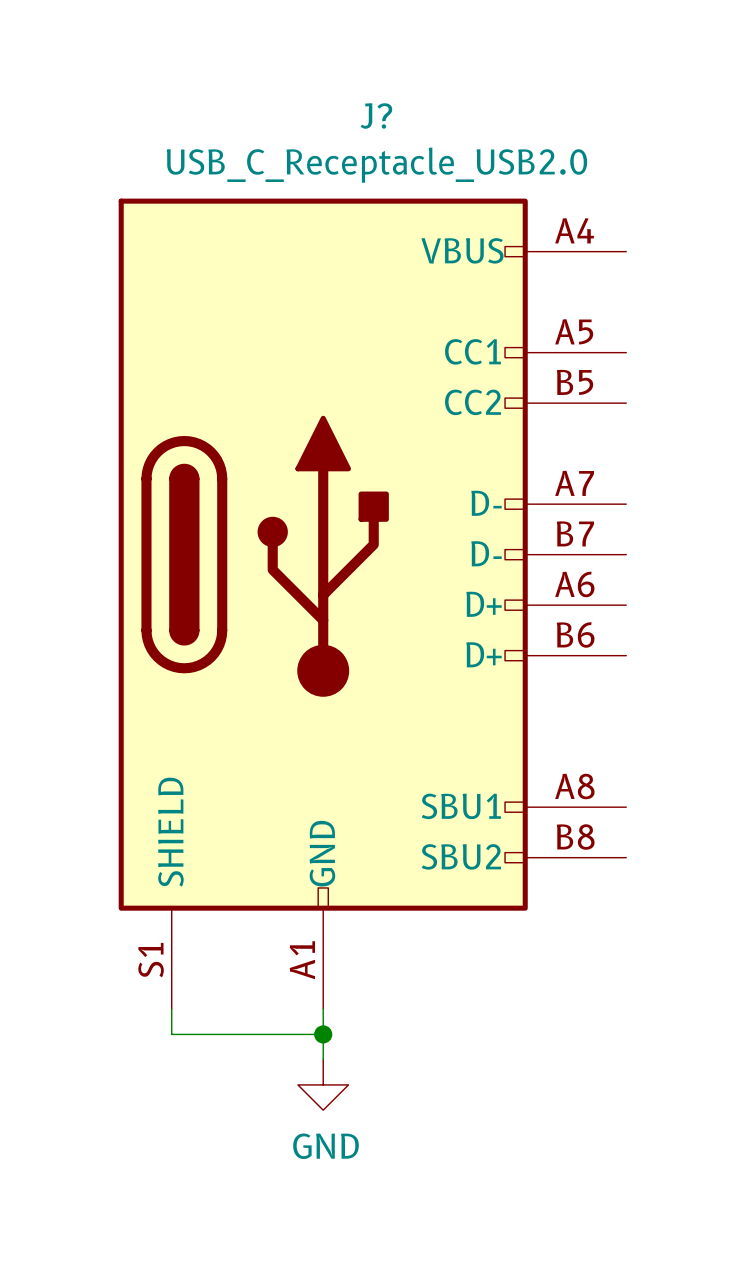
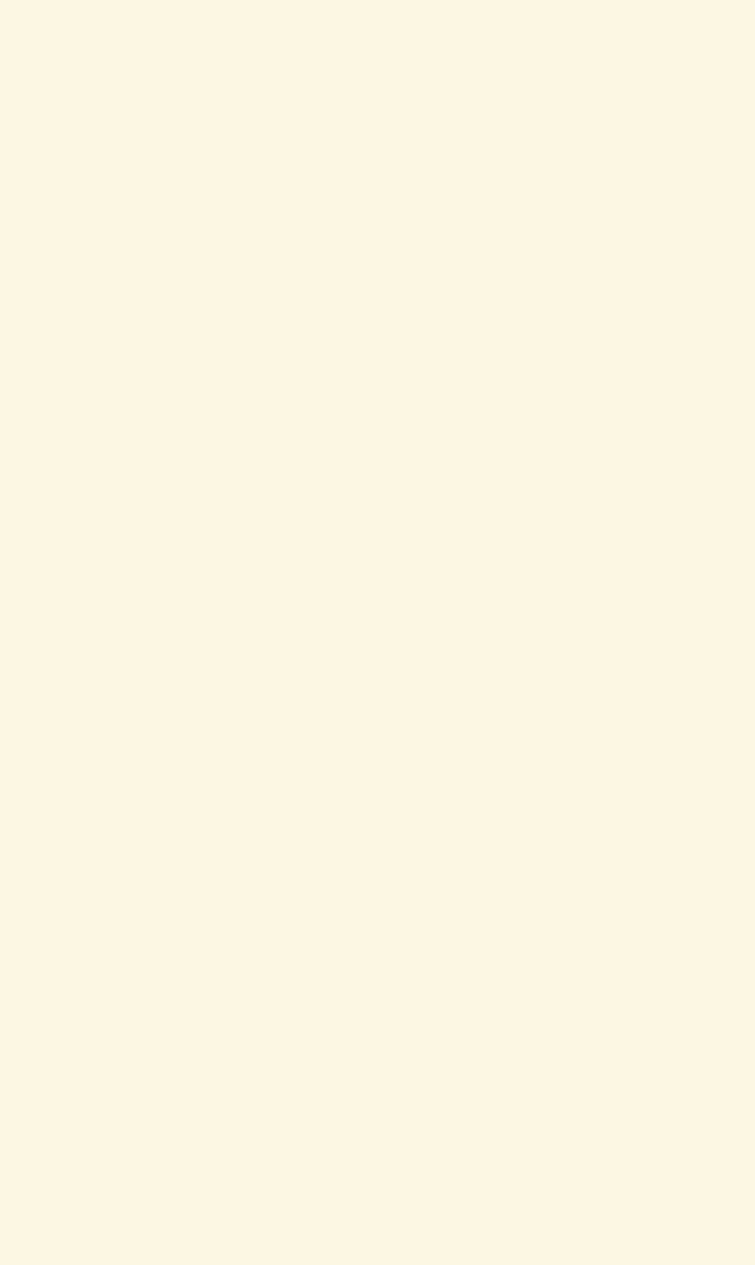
J?: USB_C_Receptacle_USB2.0 (372, 603) -> none
wire: (171, 1009) (171, 1034) (323, 1034) -> none
wire: (323, 1009) (323, 1059) -> none
junction: (323, 1034) -> none
power symbol: GND (323, 1084) -> none

